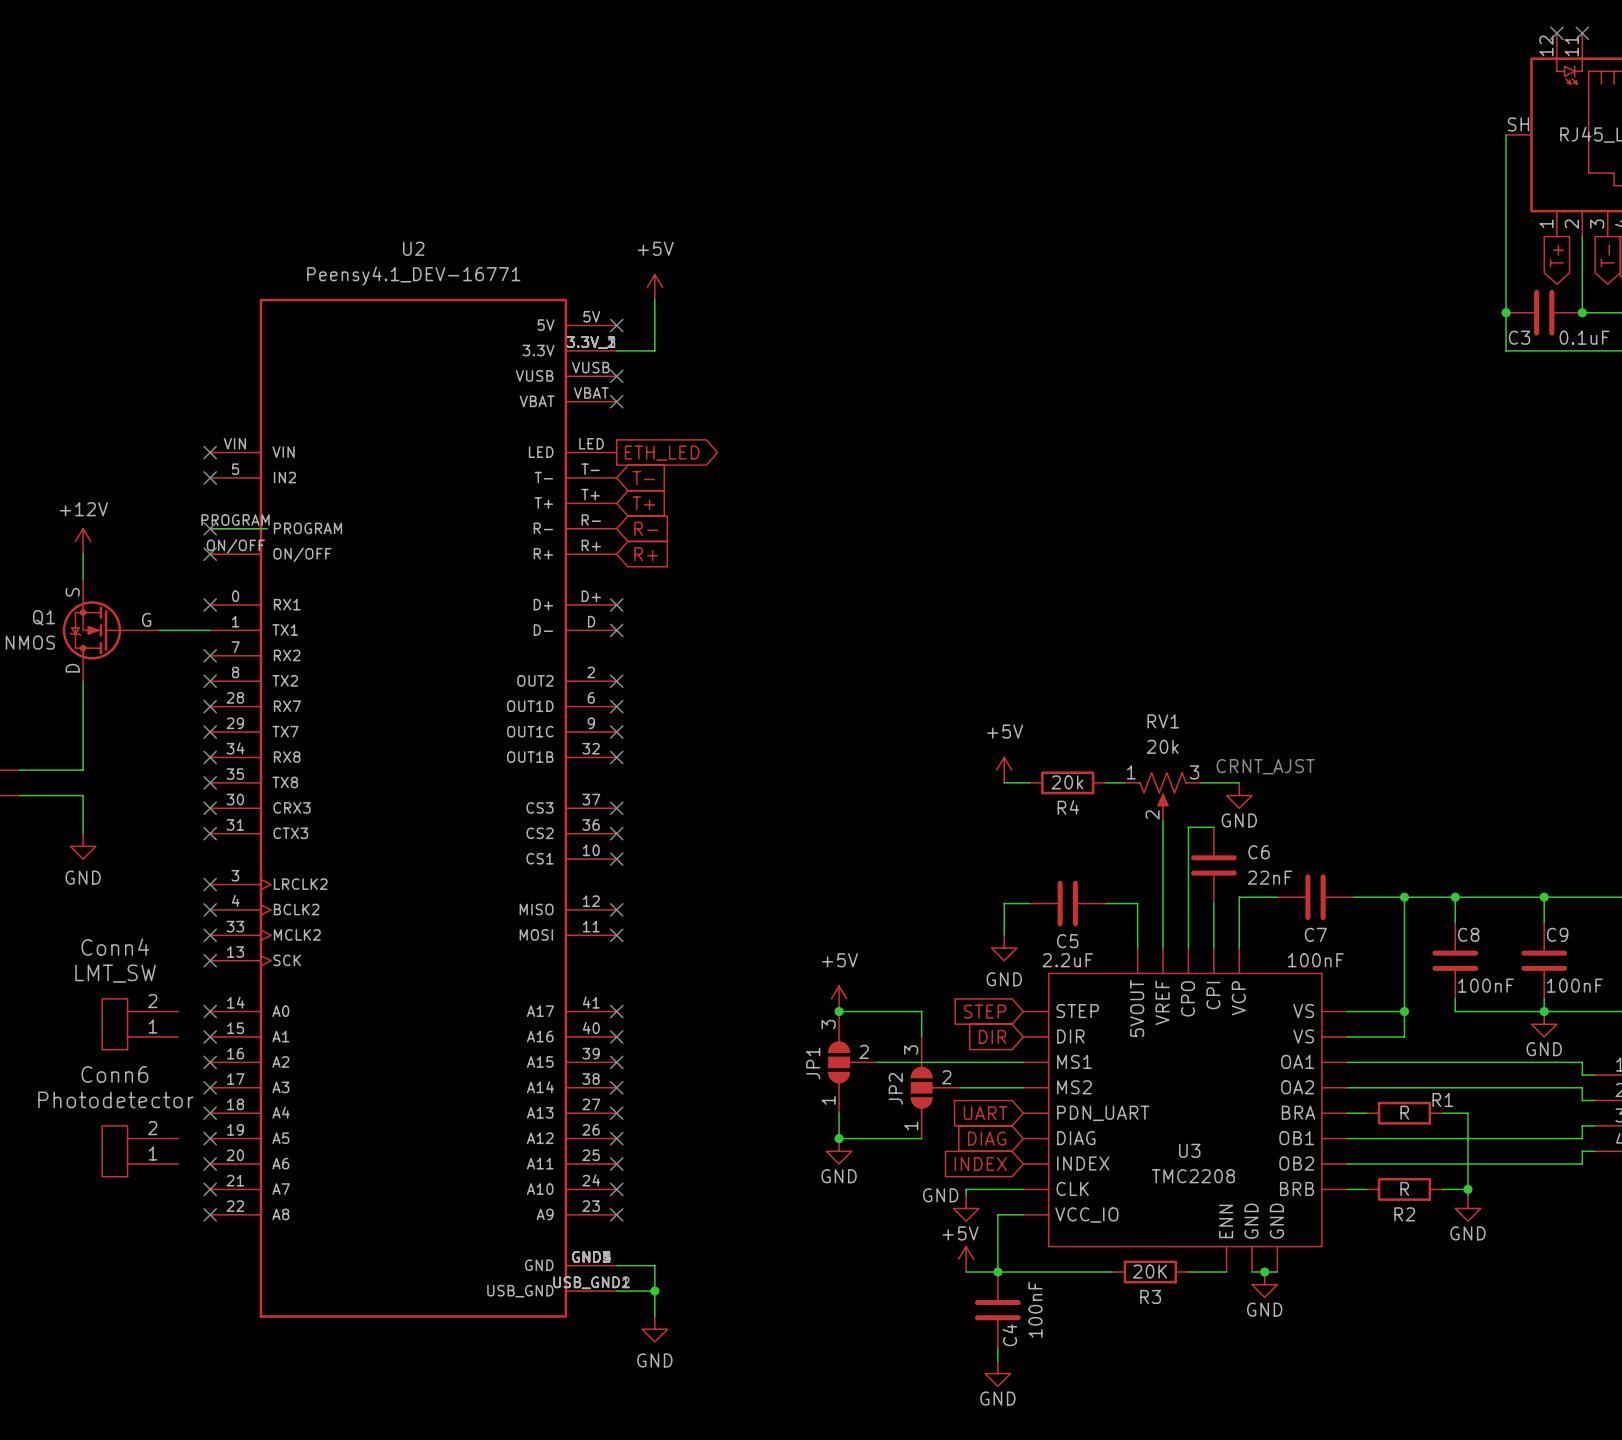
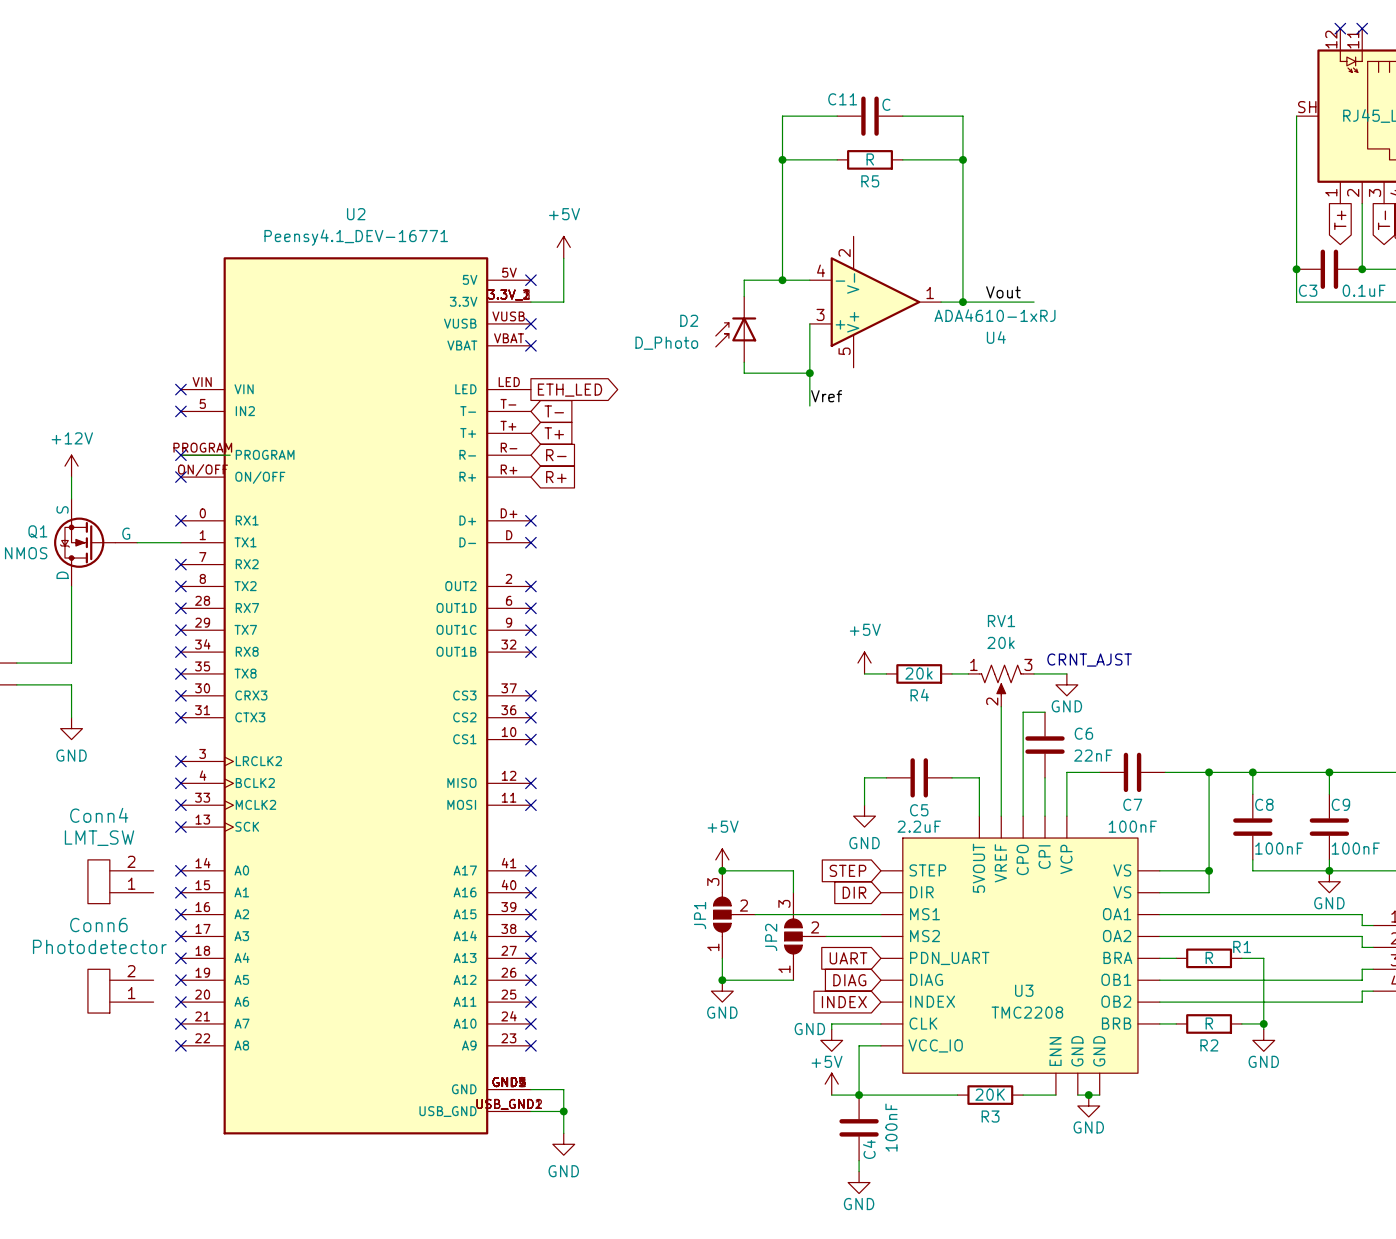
wire: none -> (837, 116) (782, 116) (782, 280)
C11: none -> C (870, 116)
wire: none -> (902, 116) (962, 116) (962, 302)
wire: none -> (782, 159) (837, 159)
junction: none -> (782, 159)
R5: none -> R (870, 159)
wire: none -> (902, 159) (962, 159)
junction: none -> (962, 159)
junction: none -> (782, 280)
wire: none -> (809, 280) (744, 280) (744, 296)
label: none -> Vout (1003, 292)
U4: none -> ADA4610-1xRJ (875, 302)
wire: none -> (941, 302) (1034, 302)
junction: none -> (962, 302)
wire: none -> (809, 323) (809, 405)
D2: none -> D_Photo (736, 329)
wire: none -> (744, 362) (744, 373) (809, 373)
junction: none -> (809, 373)
label: none -> Vref (826, 396)

